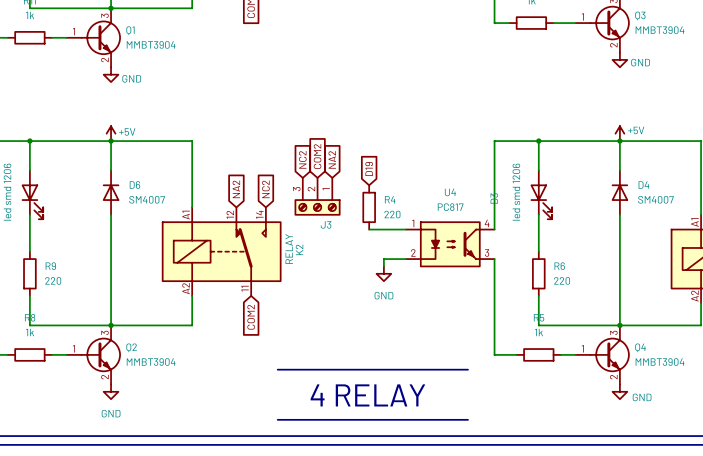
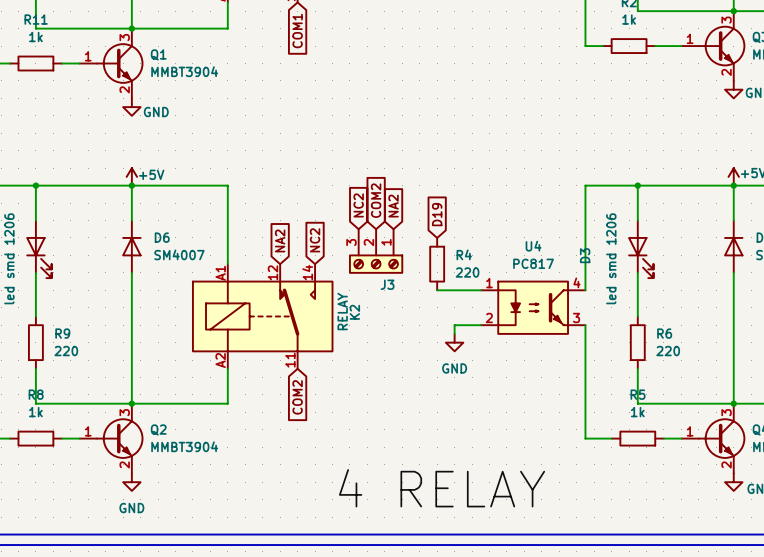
bus: (277, 369) (467, 369) -> none
text: 4 RELAY (367, 395) -> none
label: none -> 4 RELAY (442, 488)
bus: (277, 419) (467, 419) -> none

